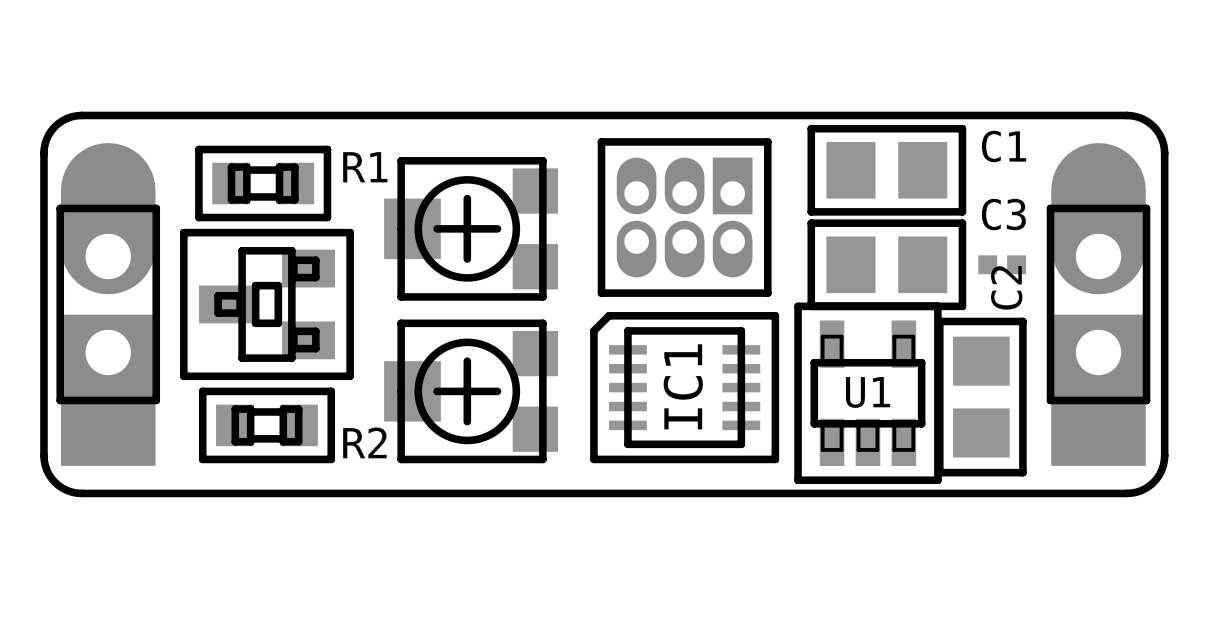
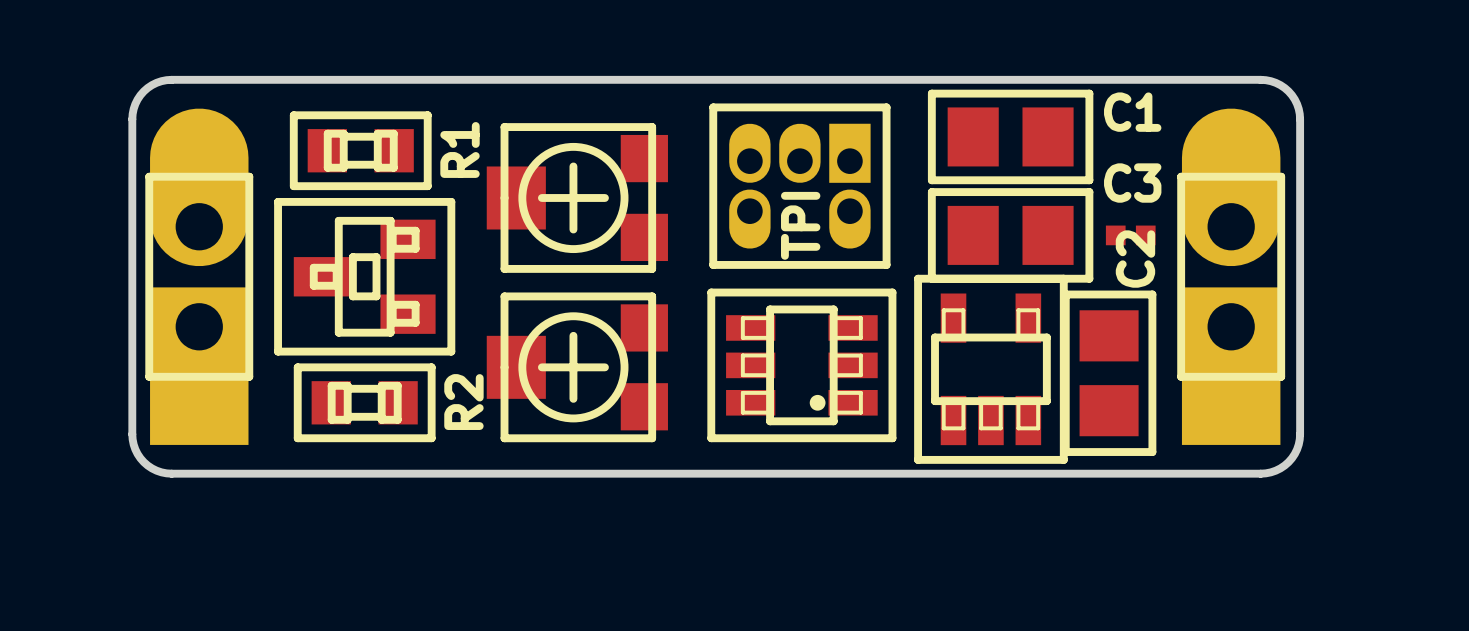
part footprint: [597, 138, 772, 297] -> [709, 103, 891, 269]
R1 name rotation: 0° (365, 167) -> 90° counterclockwise (460, 149)
part value: none -> TPI (800, 225)
IC1: (684, 387) -> none
part: none -> (801, 365)
U1 name: U1 (868, 392) -> none
R2 name rotation: 0° (364, 442) -> 90° counterclockwise (463, 402)

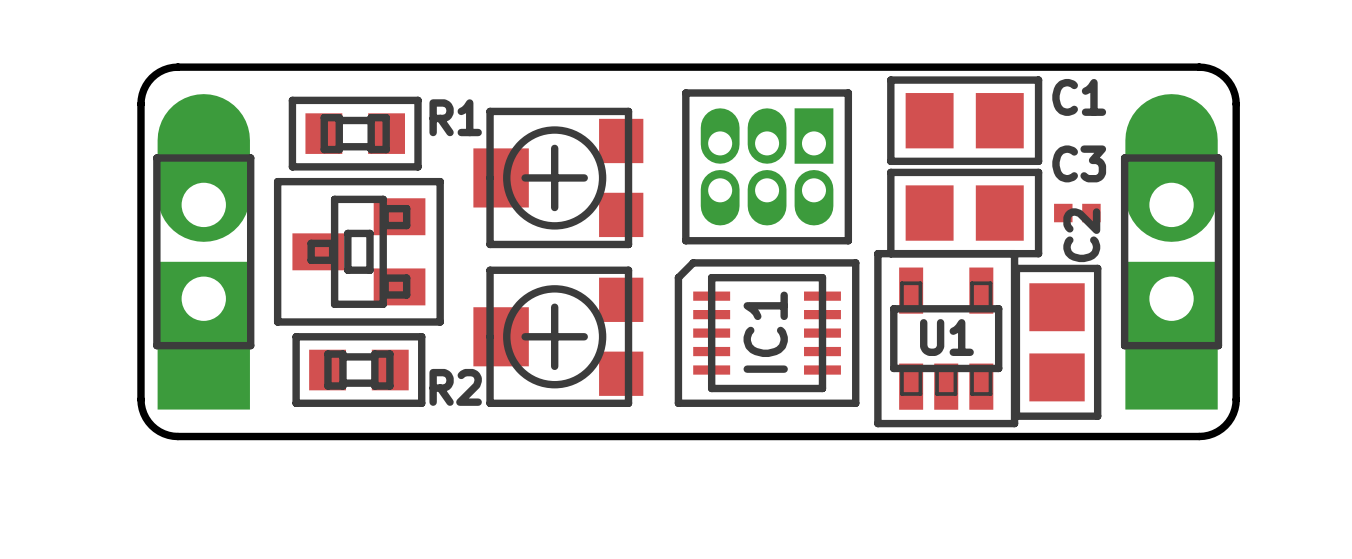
part footprint: [709, 103, 891, 269] -> [682, 89, 853, 245]
R1 name rotation: 0° (460, 149) -> 90° clockwise (455, 117)
part value: TPI (800, 225) -> none
IC1: none -> (767, 333)
part: (801, 365) -> none
U1 name: none -> U1 (946, 337)
R2 name rotation: 0° (463, 402) -> 90° clockwise (455, 387)

